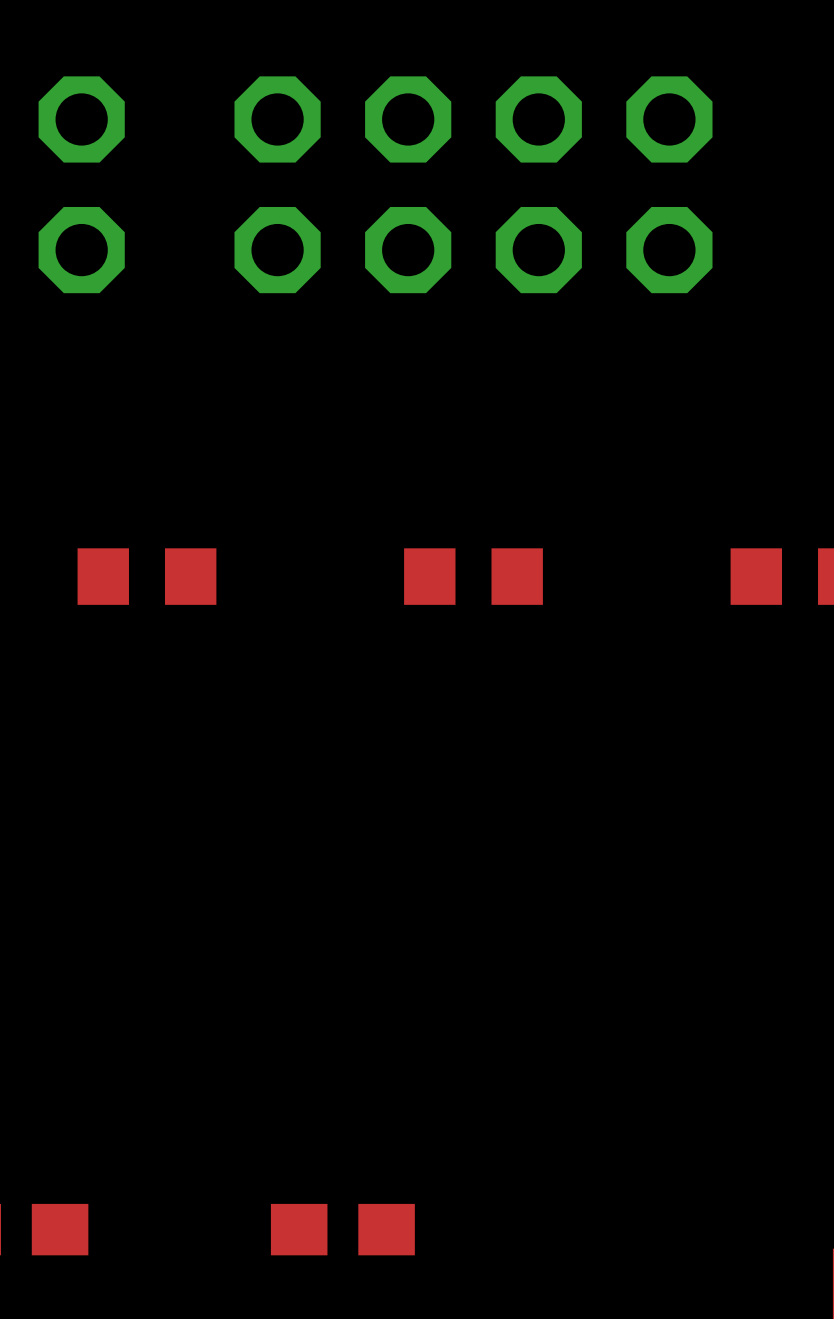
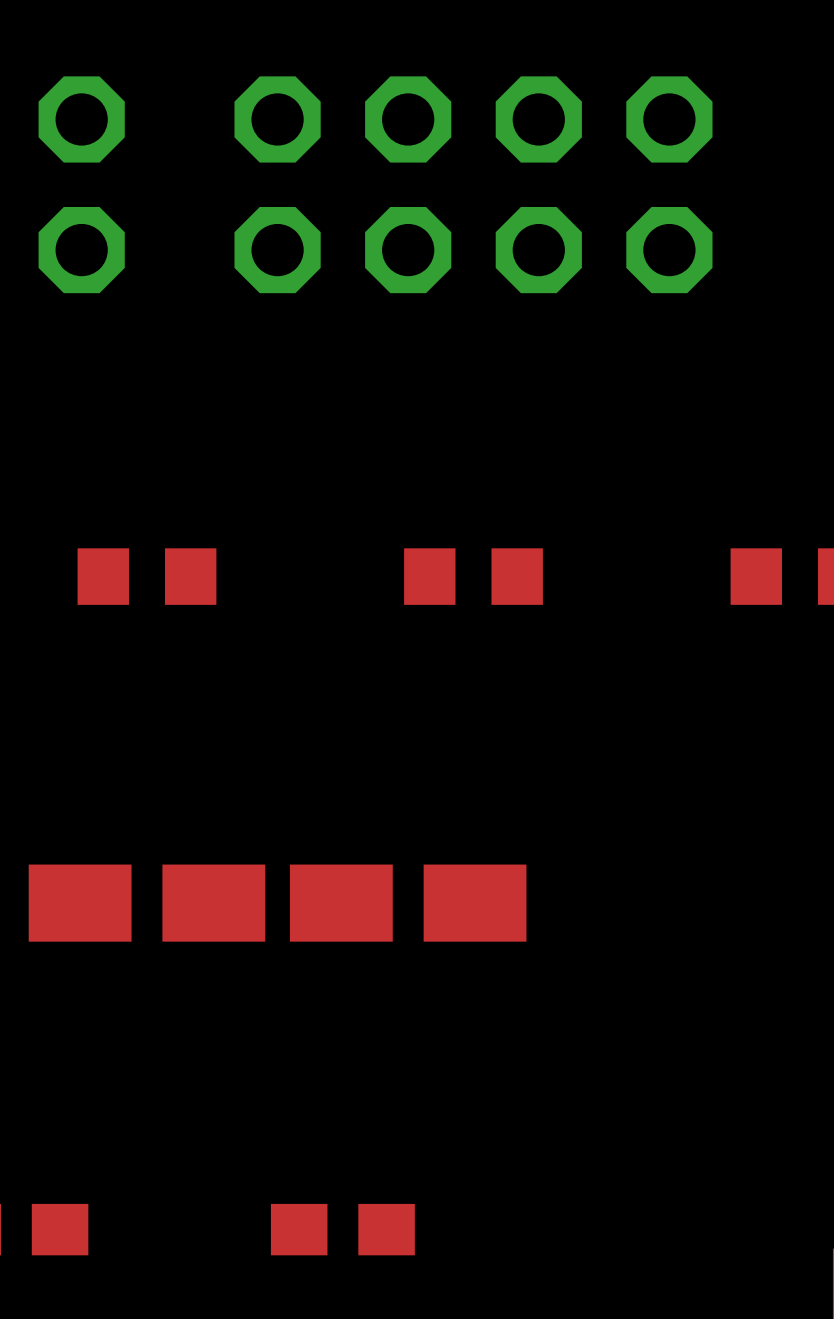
part: none -> (146, 903)
part: none -> (408, 903)

